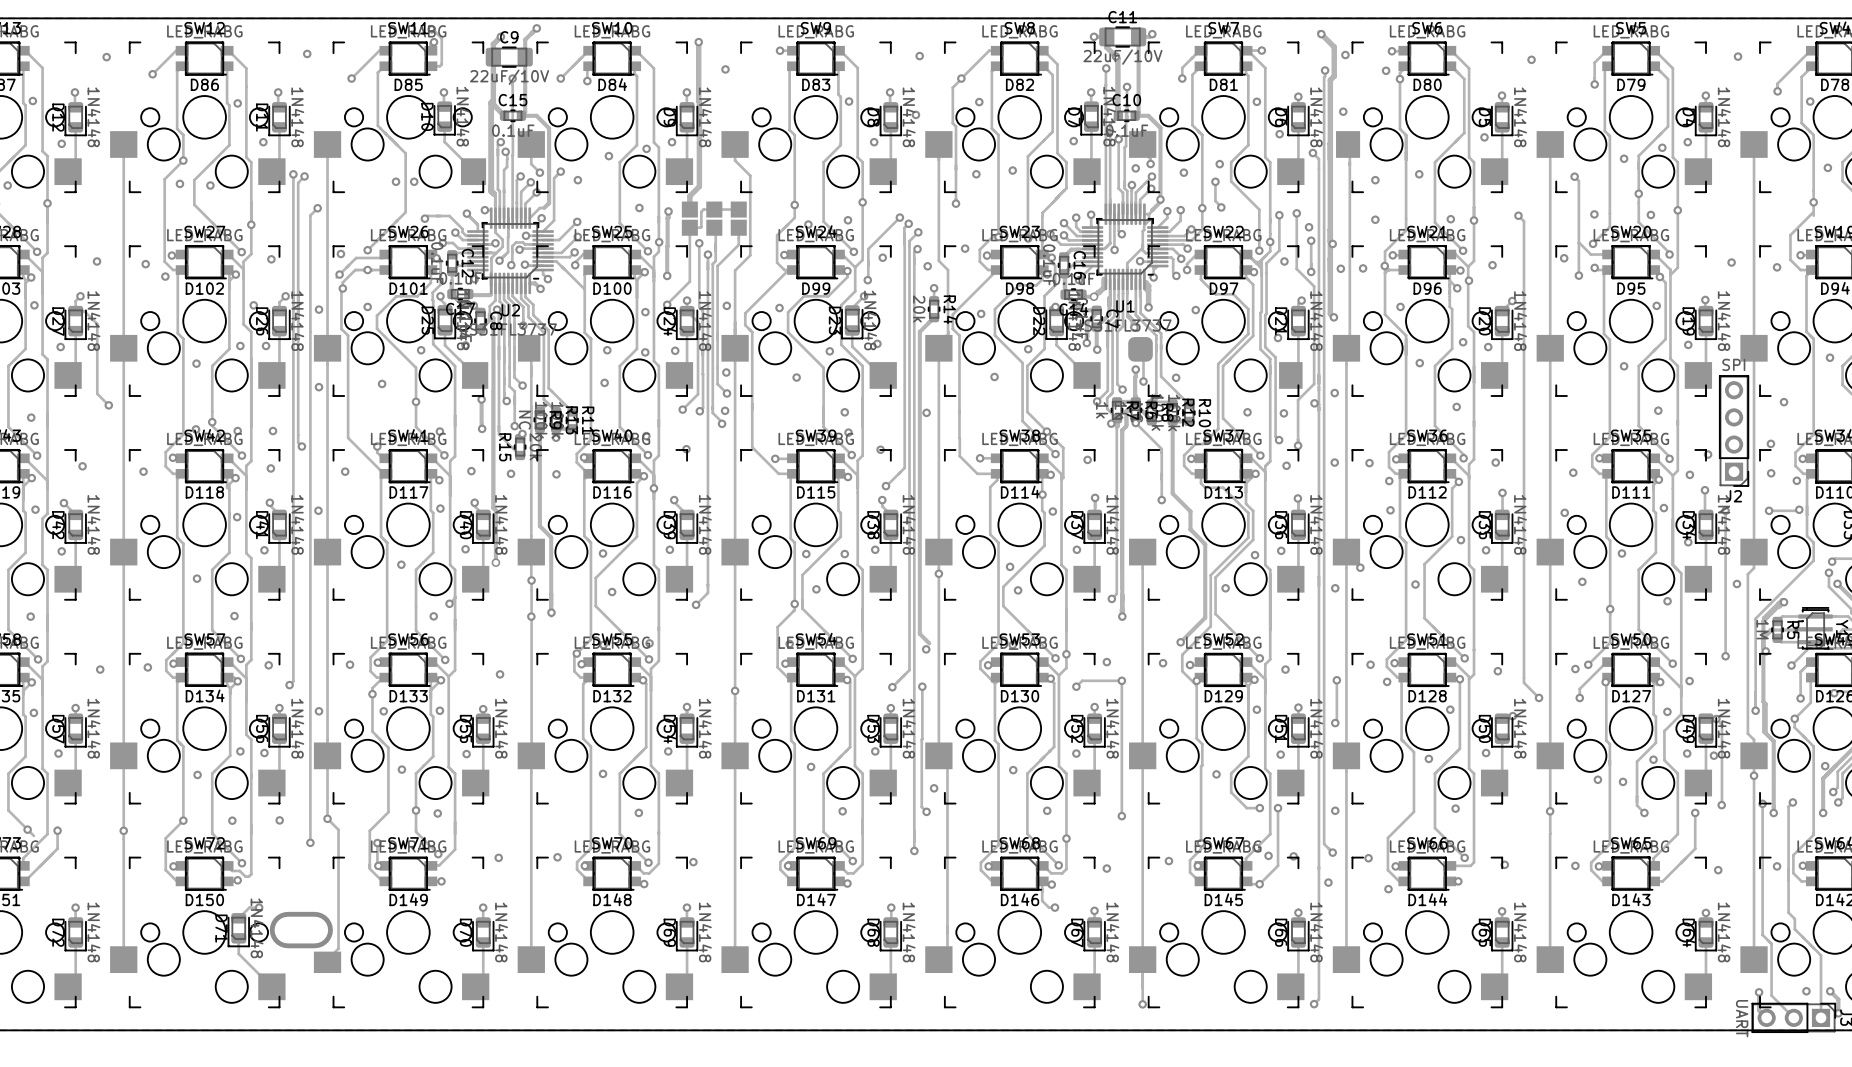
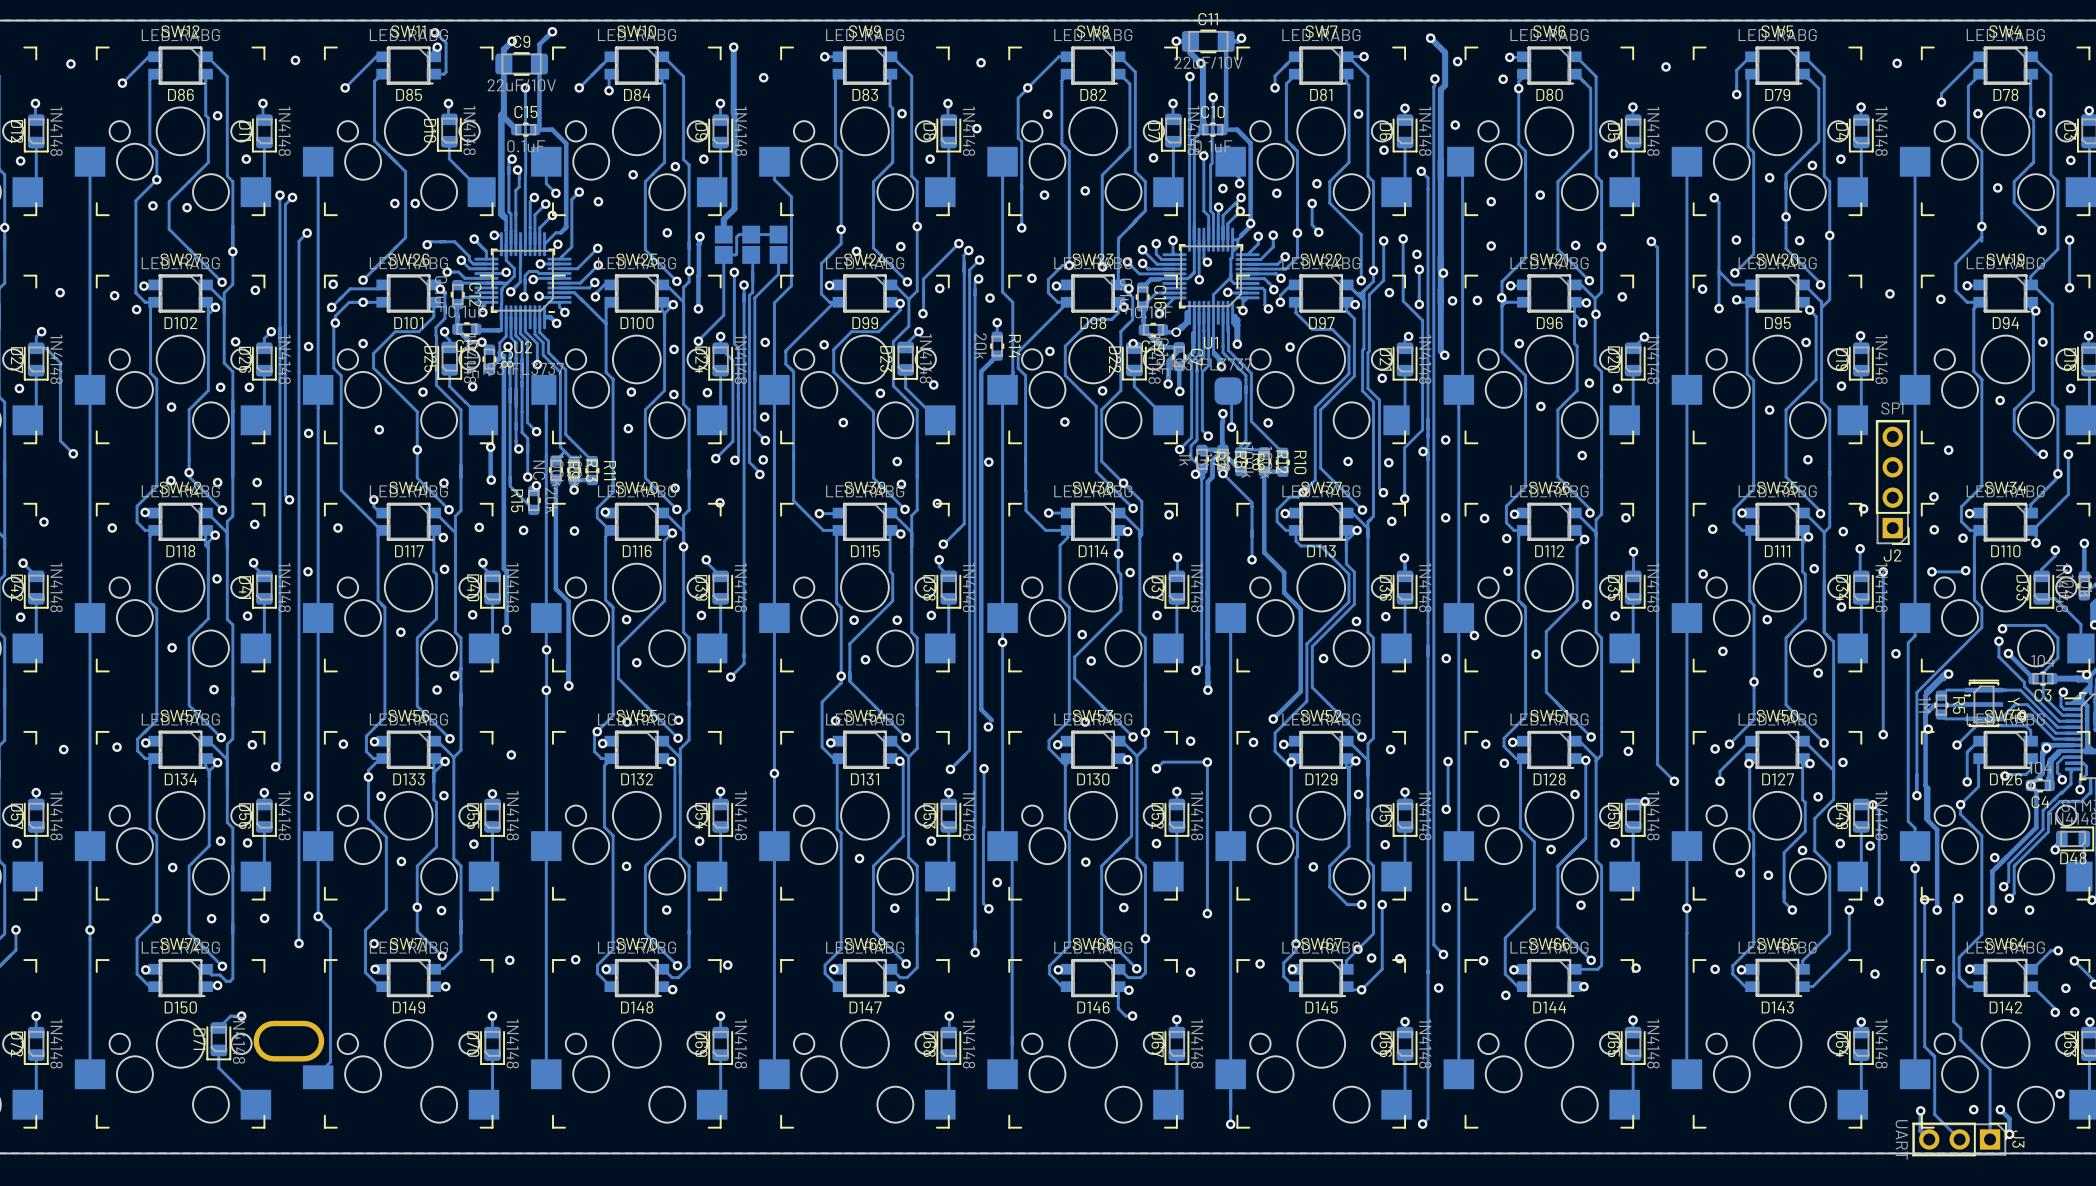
track: (377, 843) (378, 865) -> none

